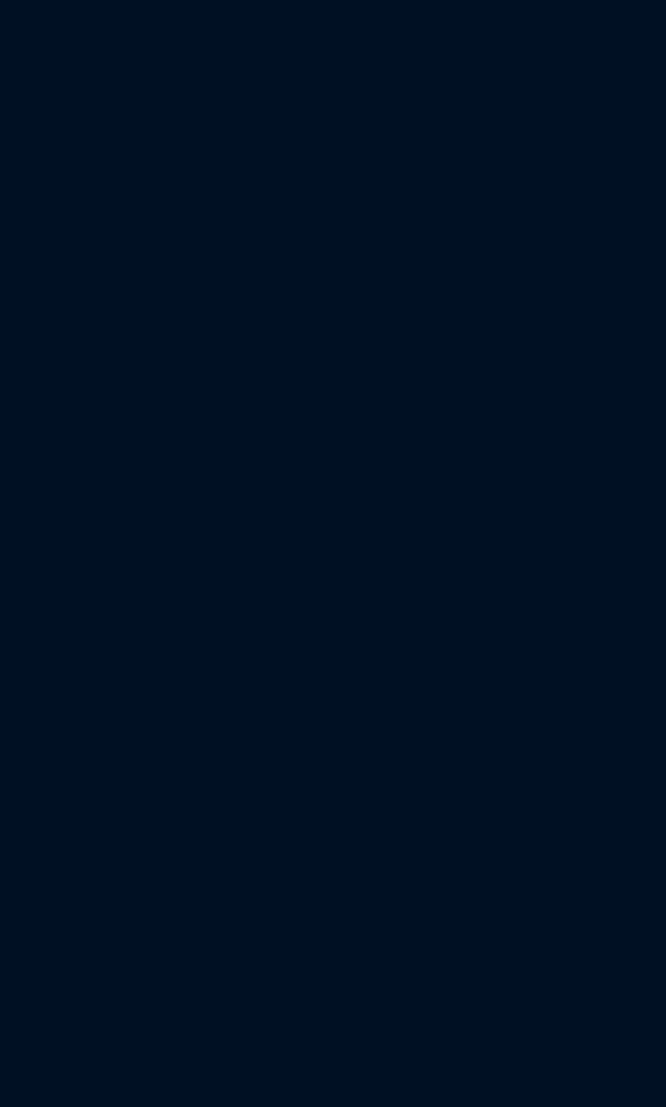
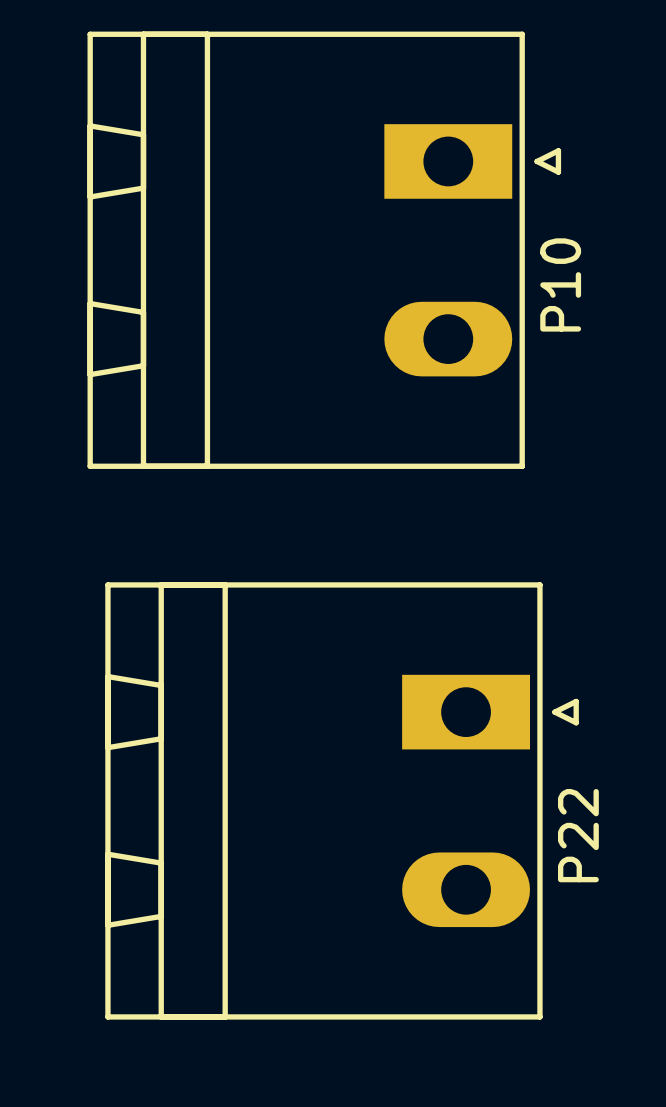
P10: none -> (324, 250)
P22: none -> (342, 800)

